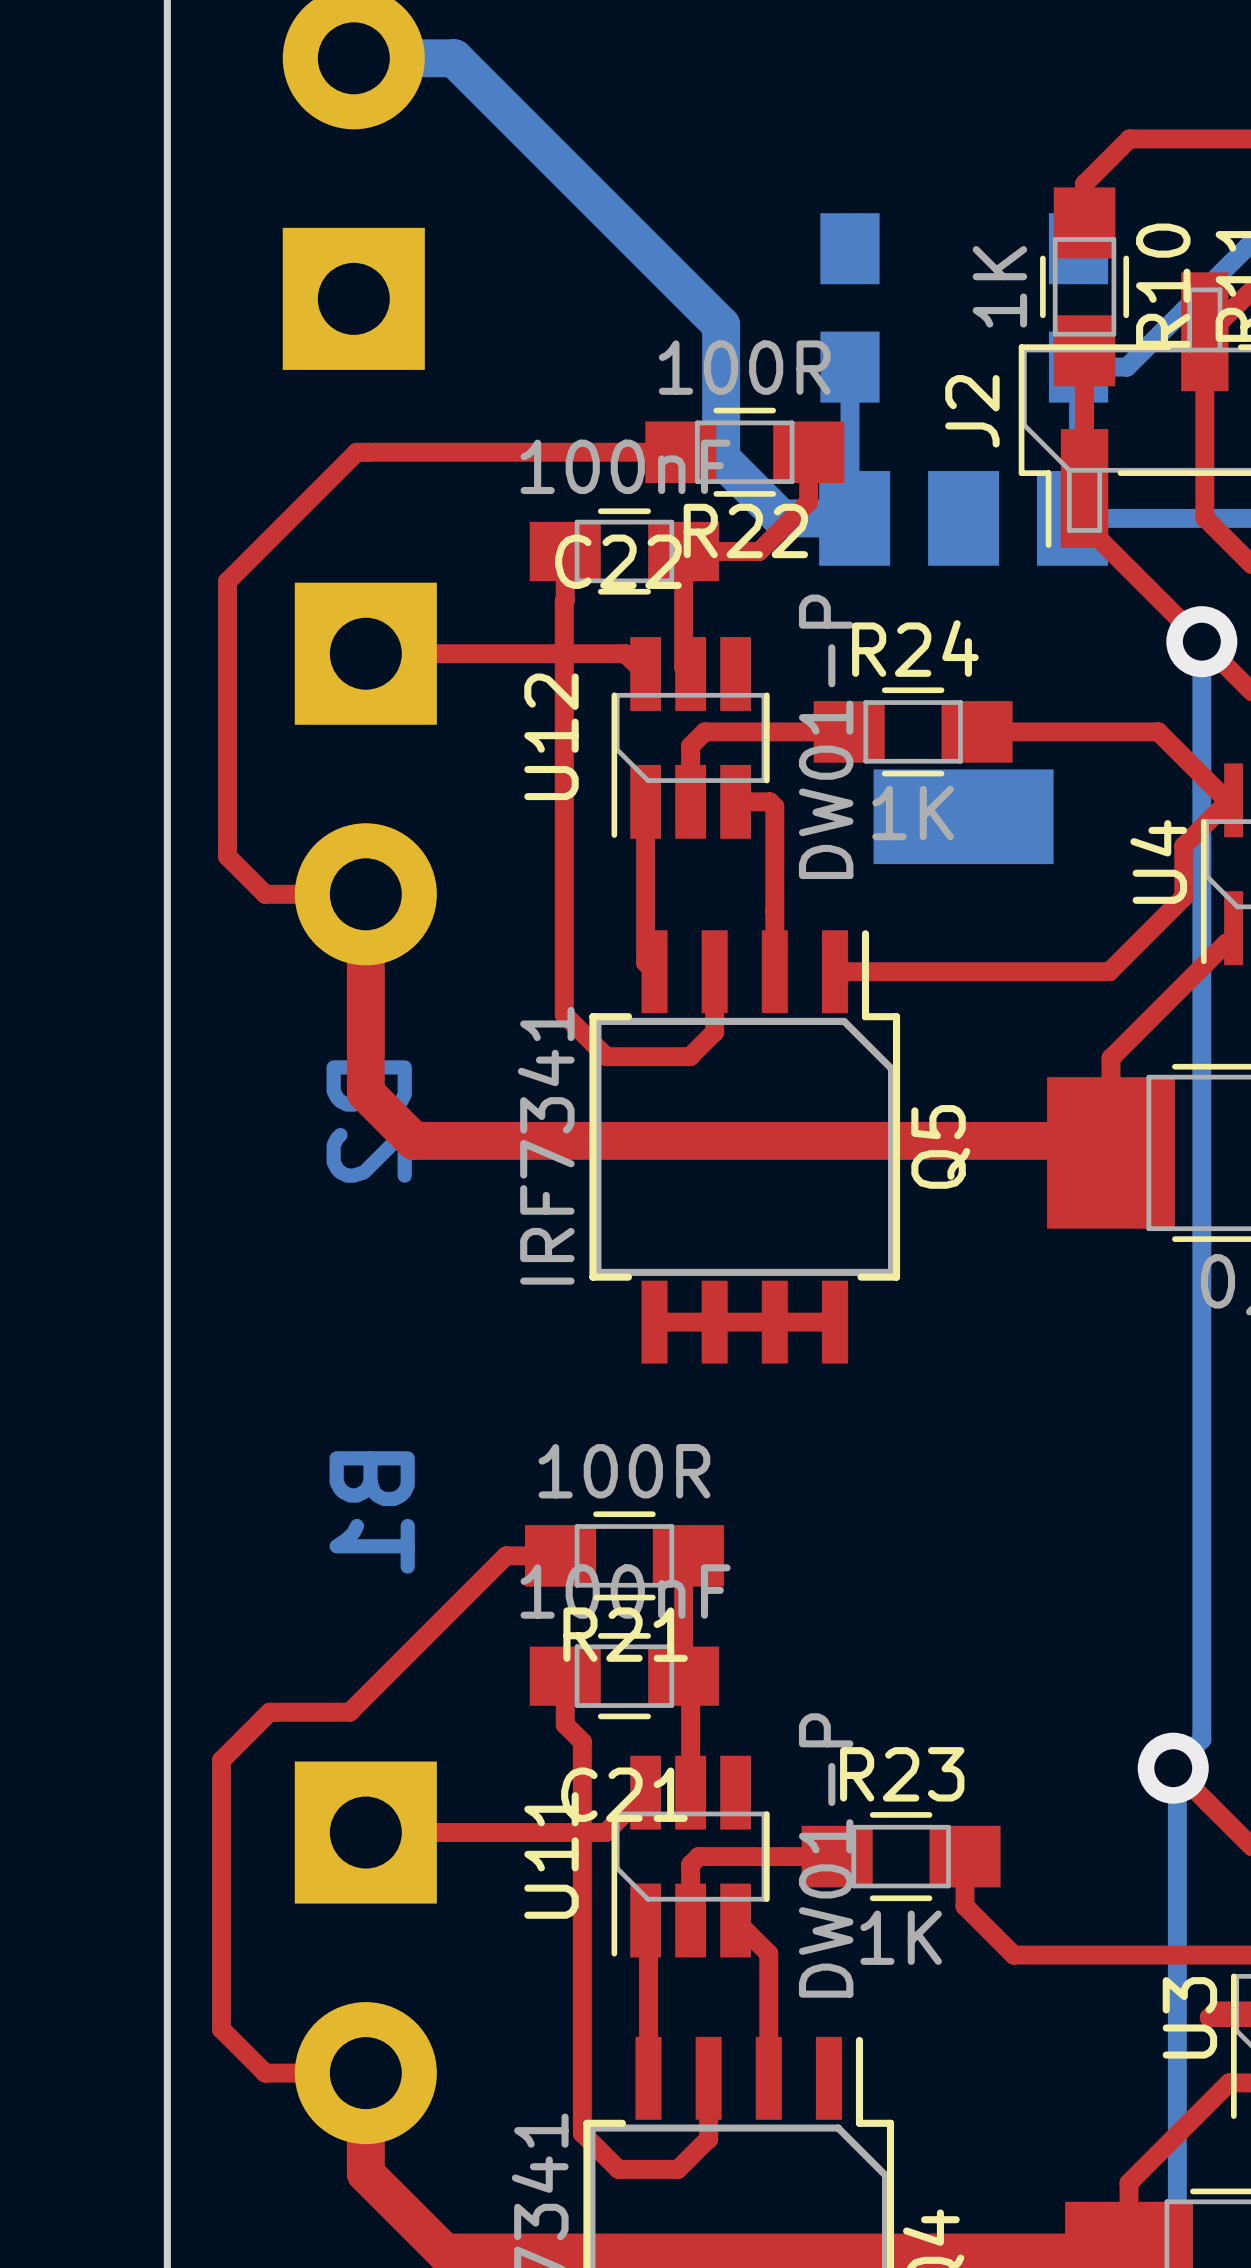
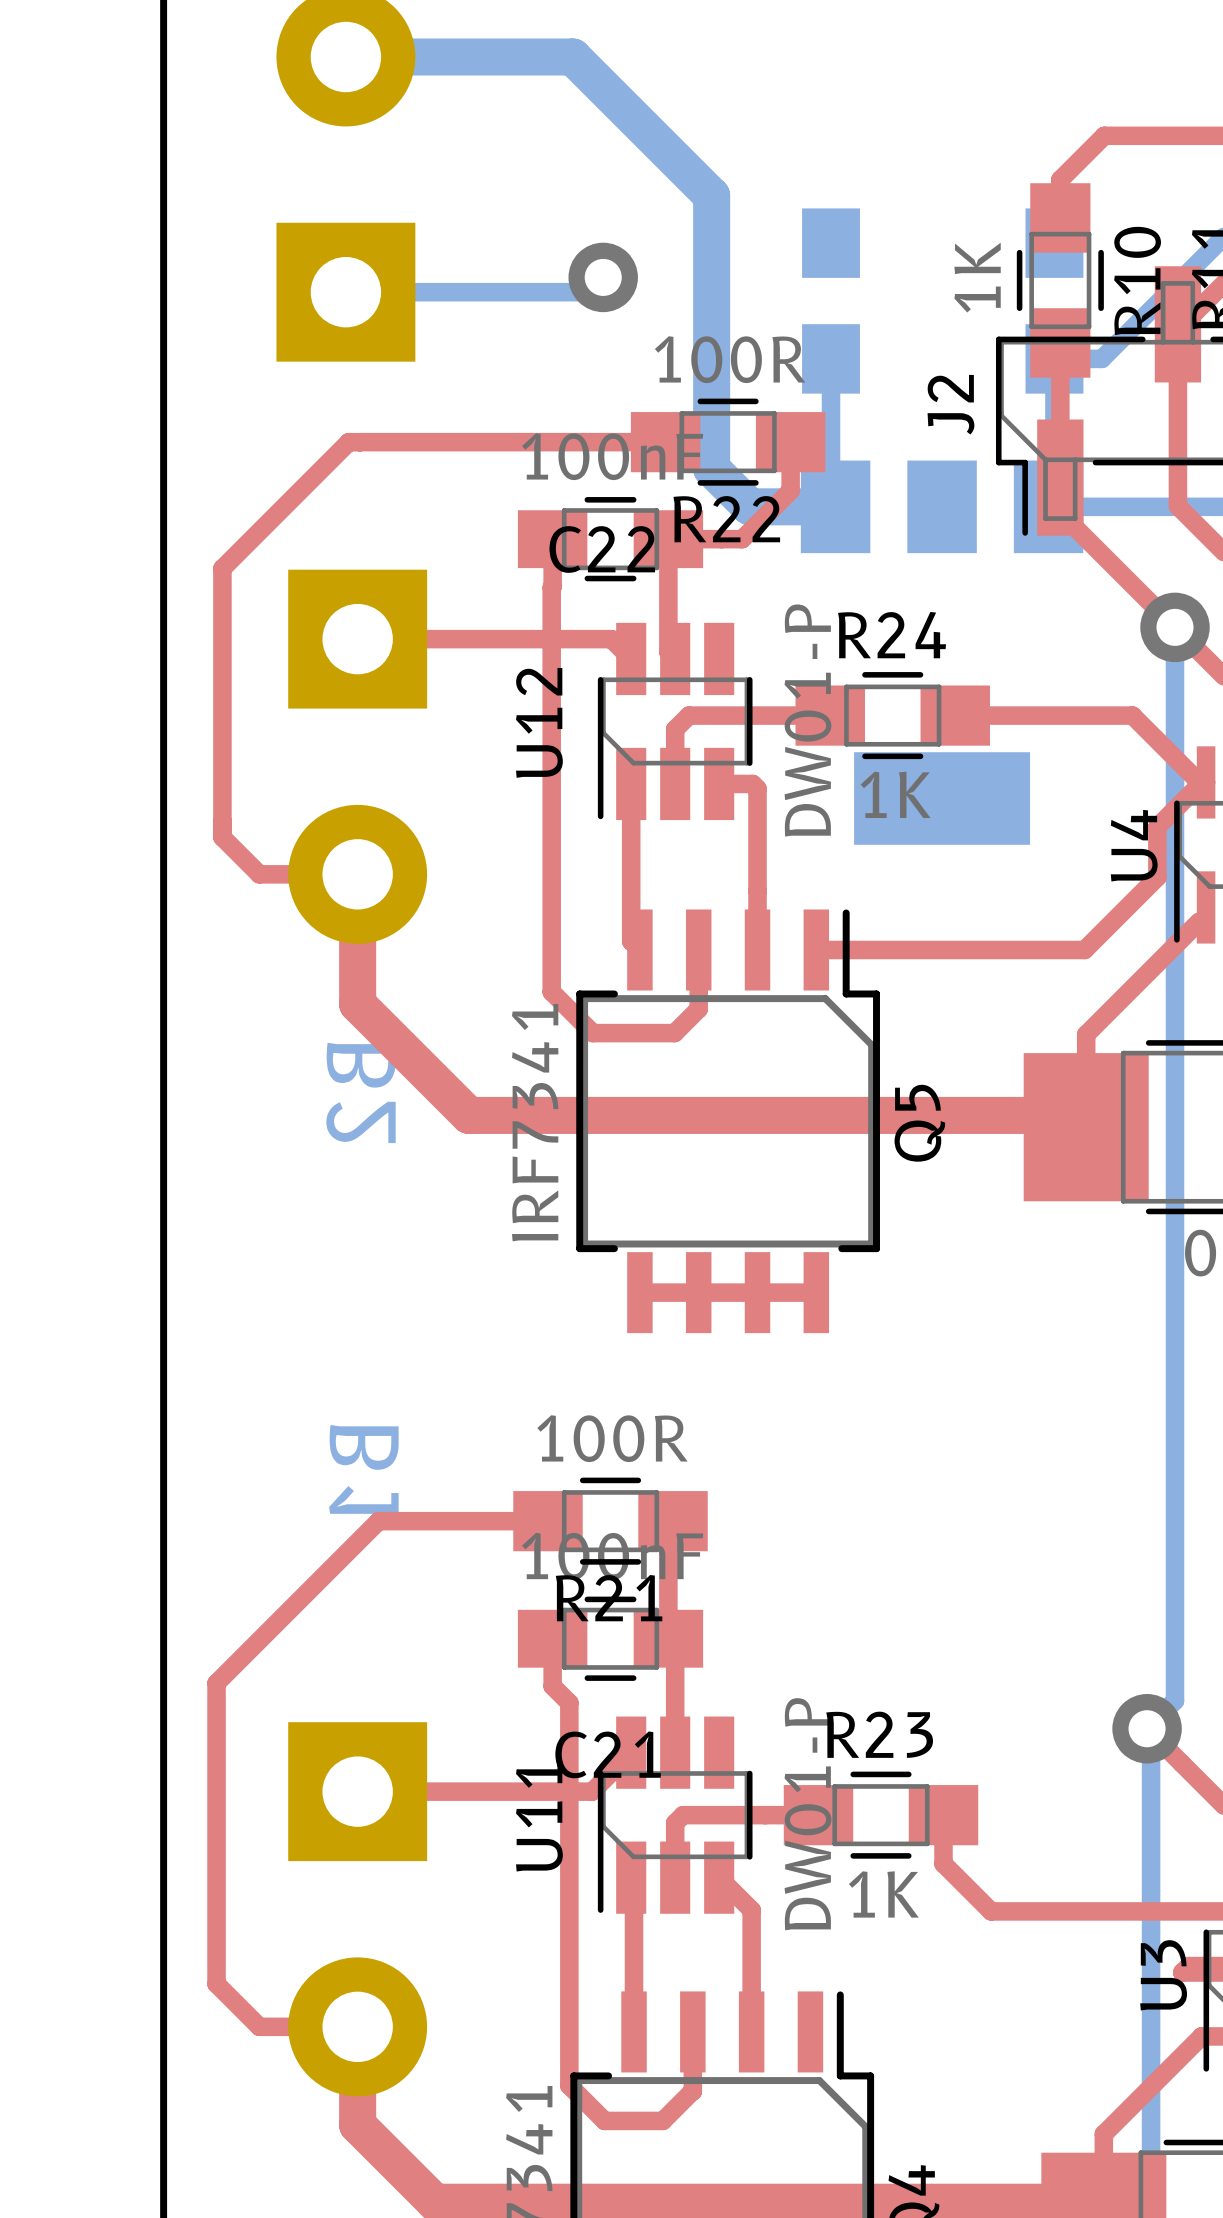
bottom track: (454, 58) (721, 325) (721, 458) (781, 518) -> (444, 57) (572, 57) (711, 195) (711, 468) (749, 506) (763, 506)
bottom track: none -> (603, 277) (588, 292) (345, 292)
via: none -> (603, 277)
top track: (365, 1027) (365, 1092) (413, 1140) (479, 1140) -> (357, 1004) (468, 1115)
top track: (506, 1555) (349, 1712) (269, 1712) (221, 1760) -> (494, 1521) (378, 1521) (216, 1683) (216, 1721)

